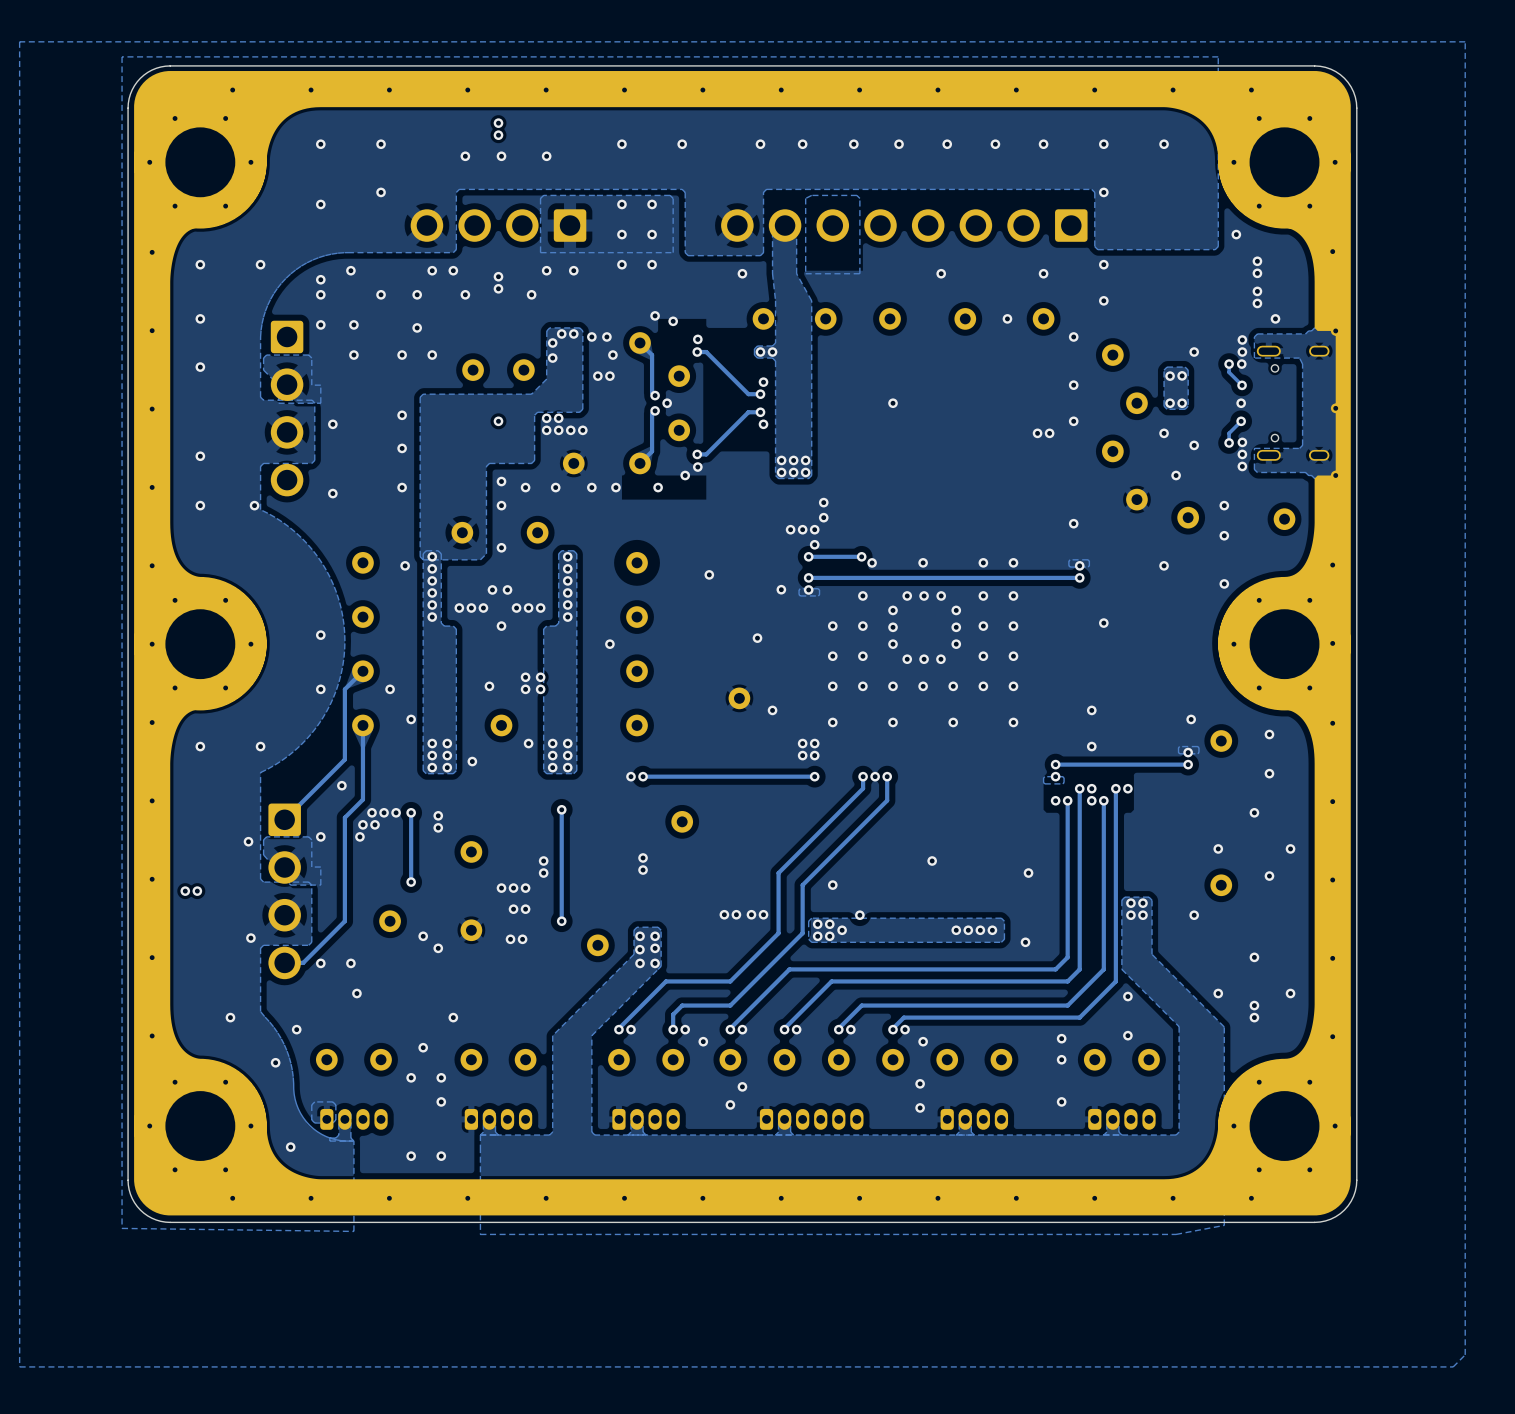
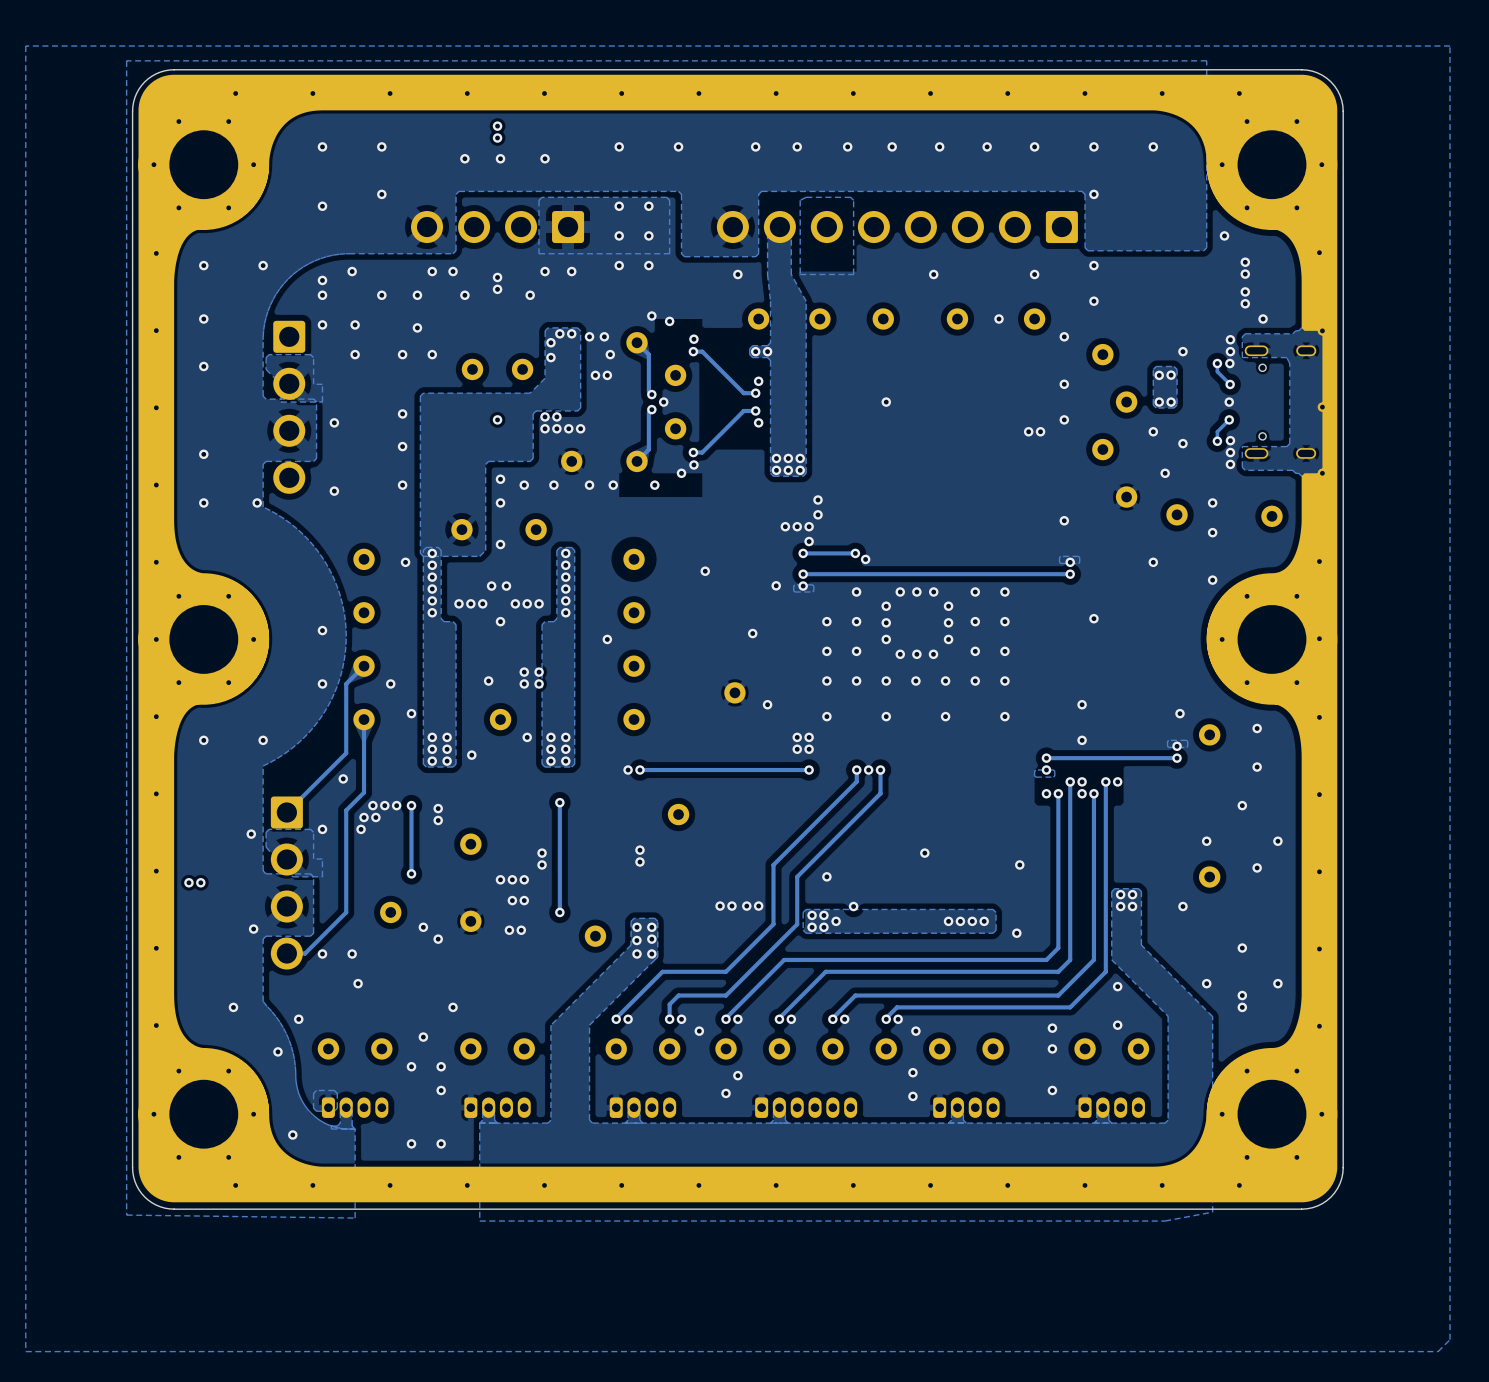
via: (923, 562) -> none
via: (983, 562) -> none
via: (1013, 562) -> none

